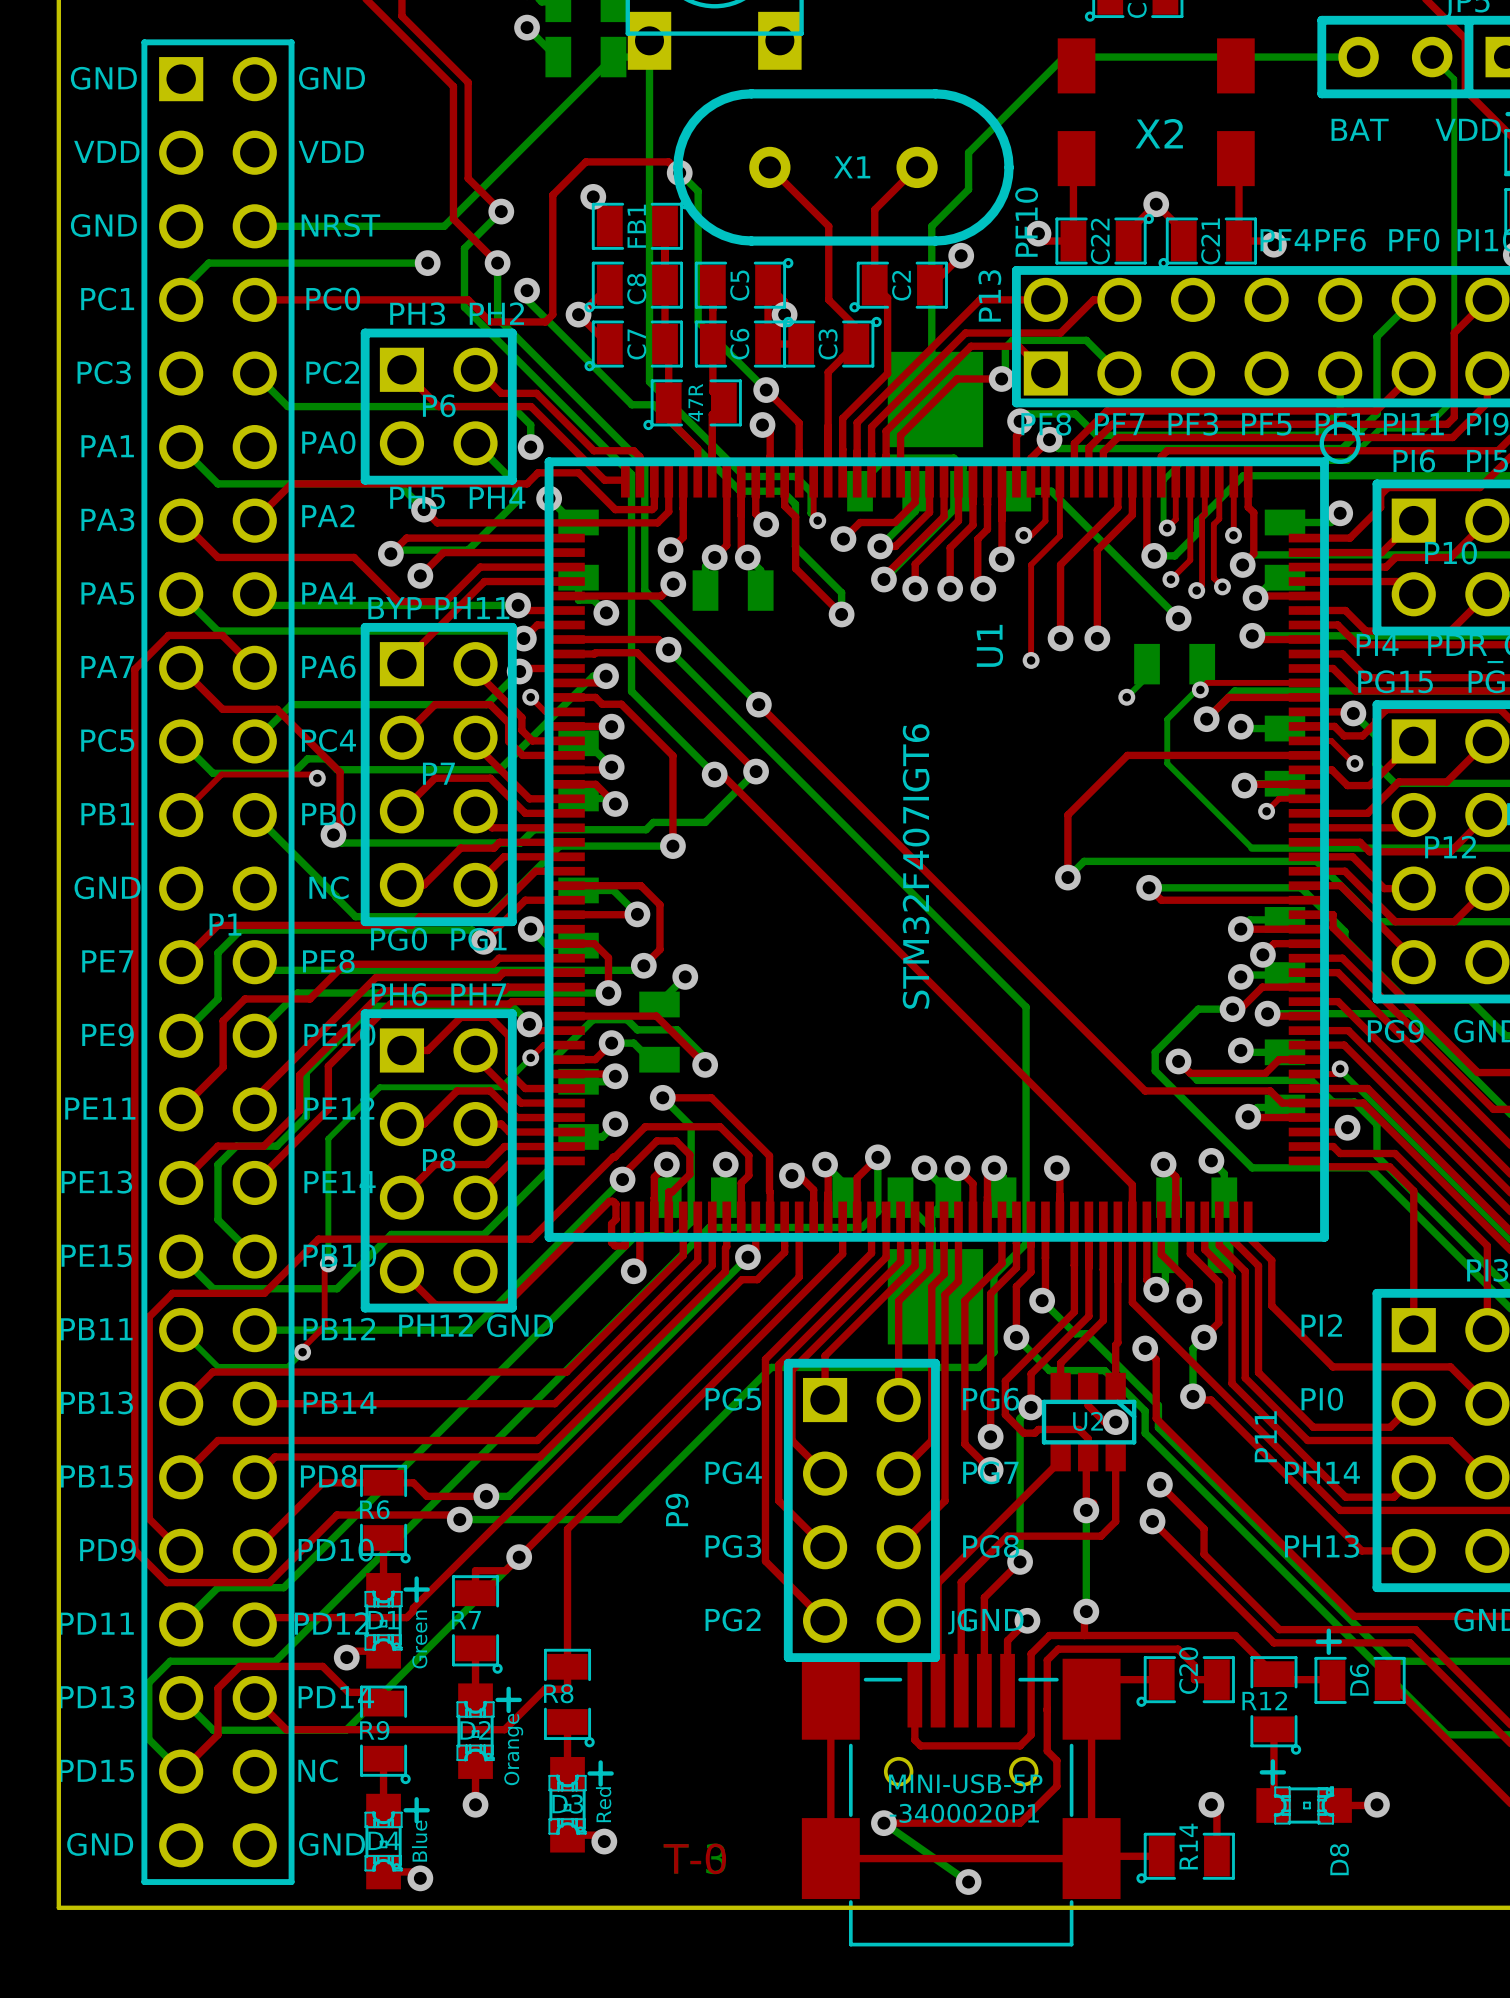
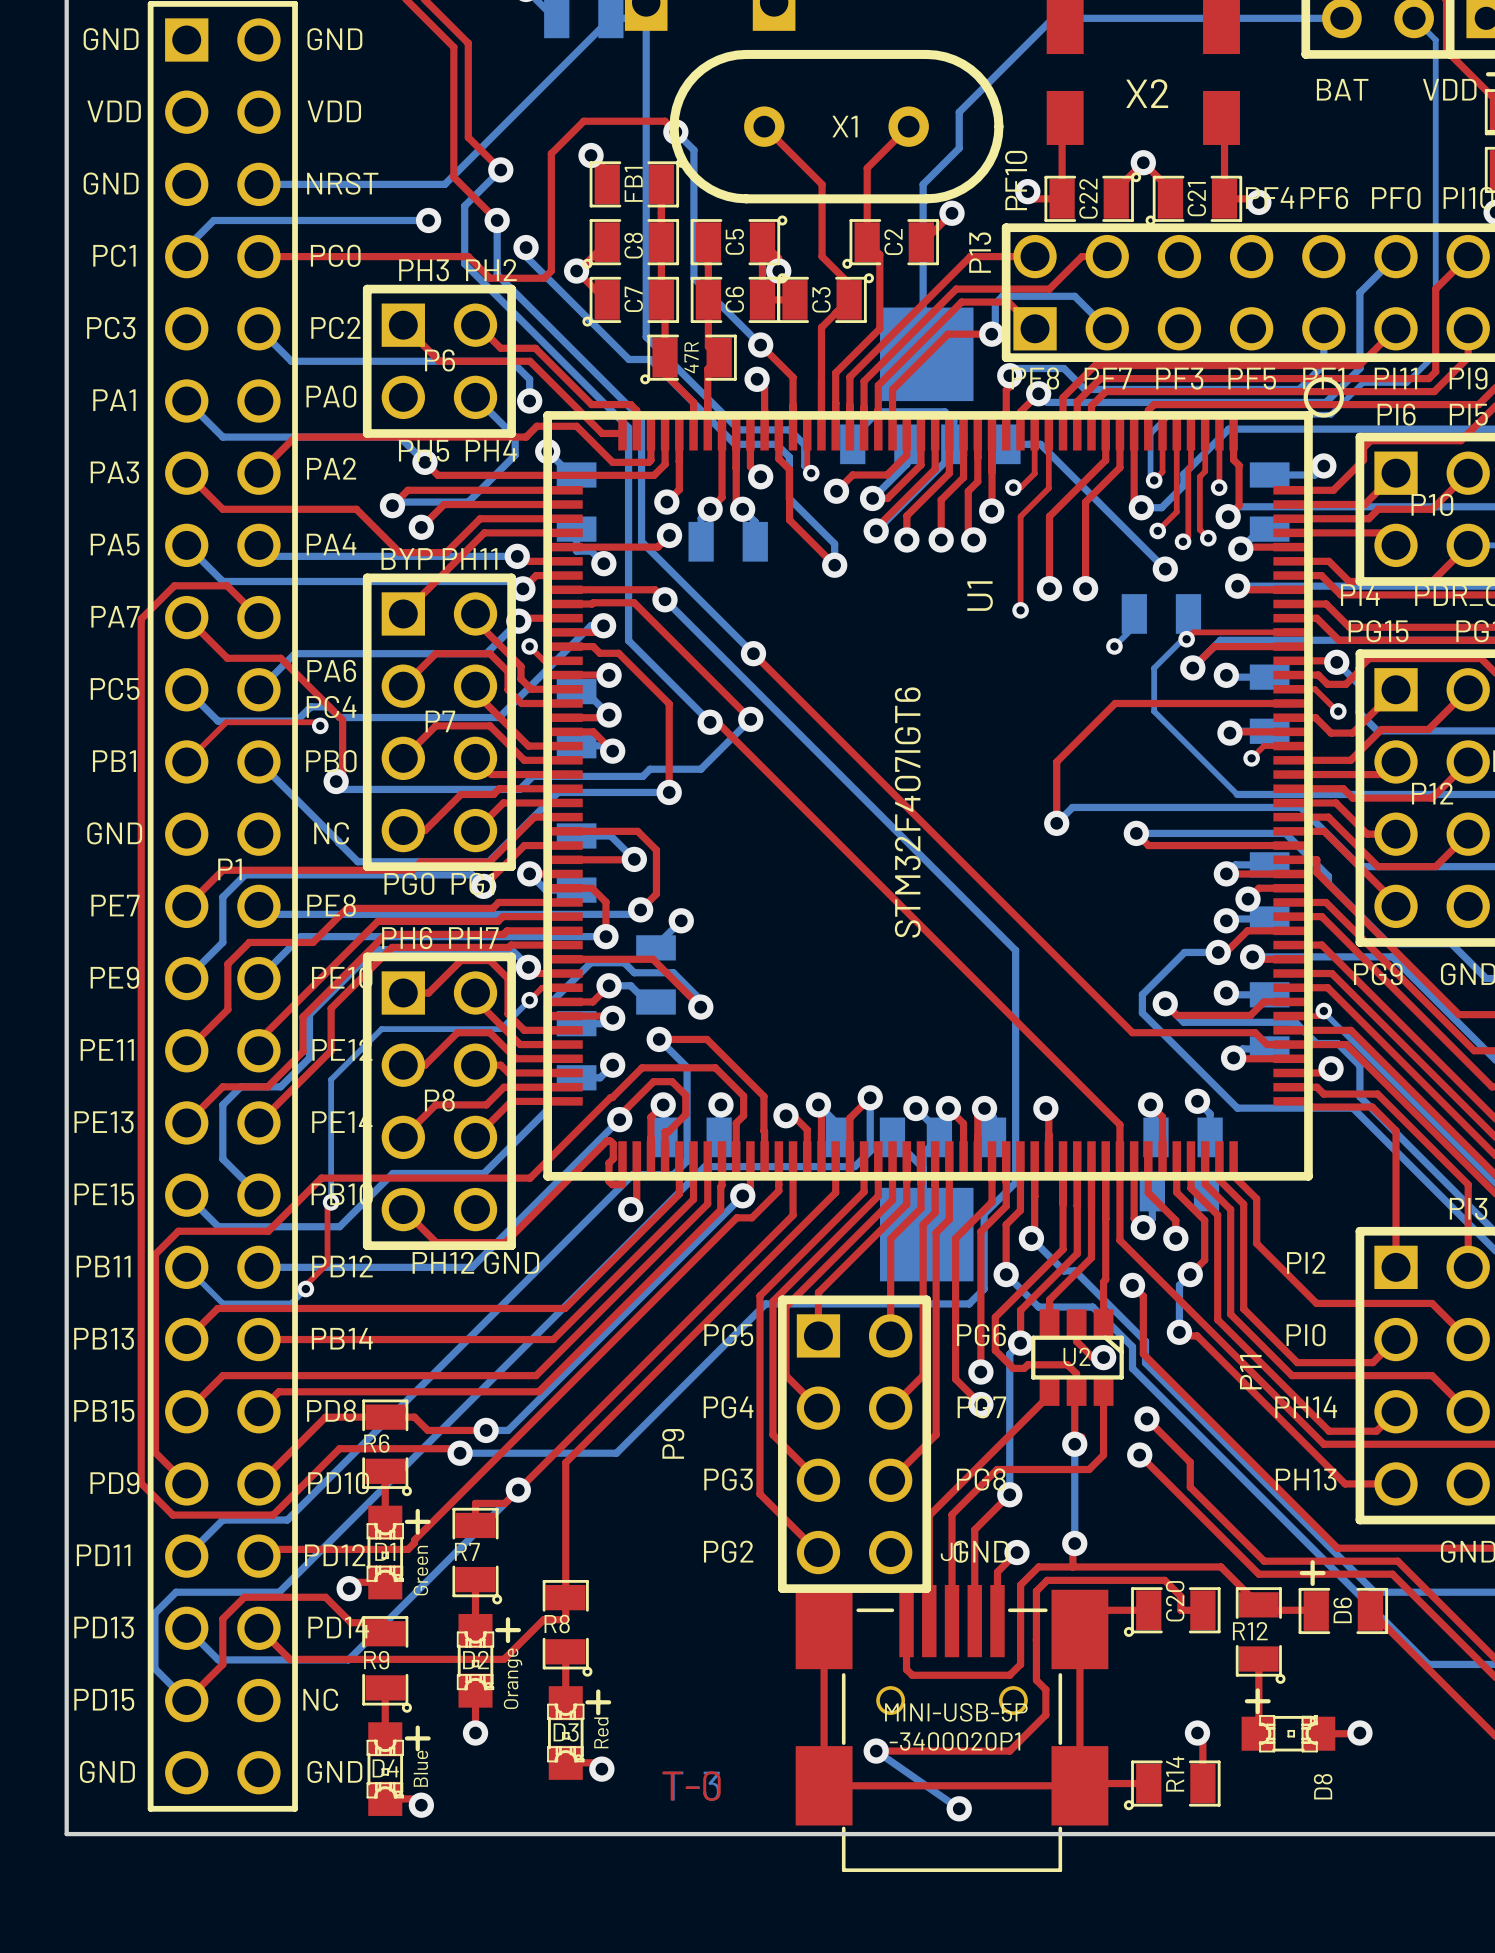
text position: PA6 (328, 667) -> PA6 (331, 670)
text position: PC4 (328, 740) -> PC4 (331, 707)

